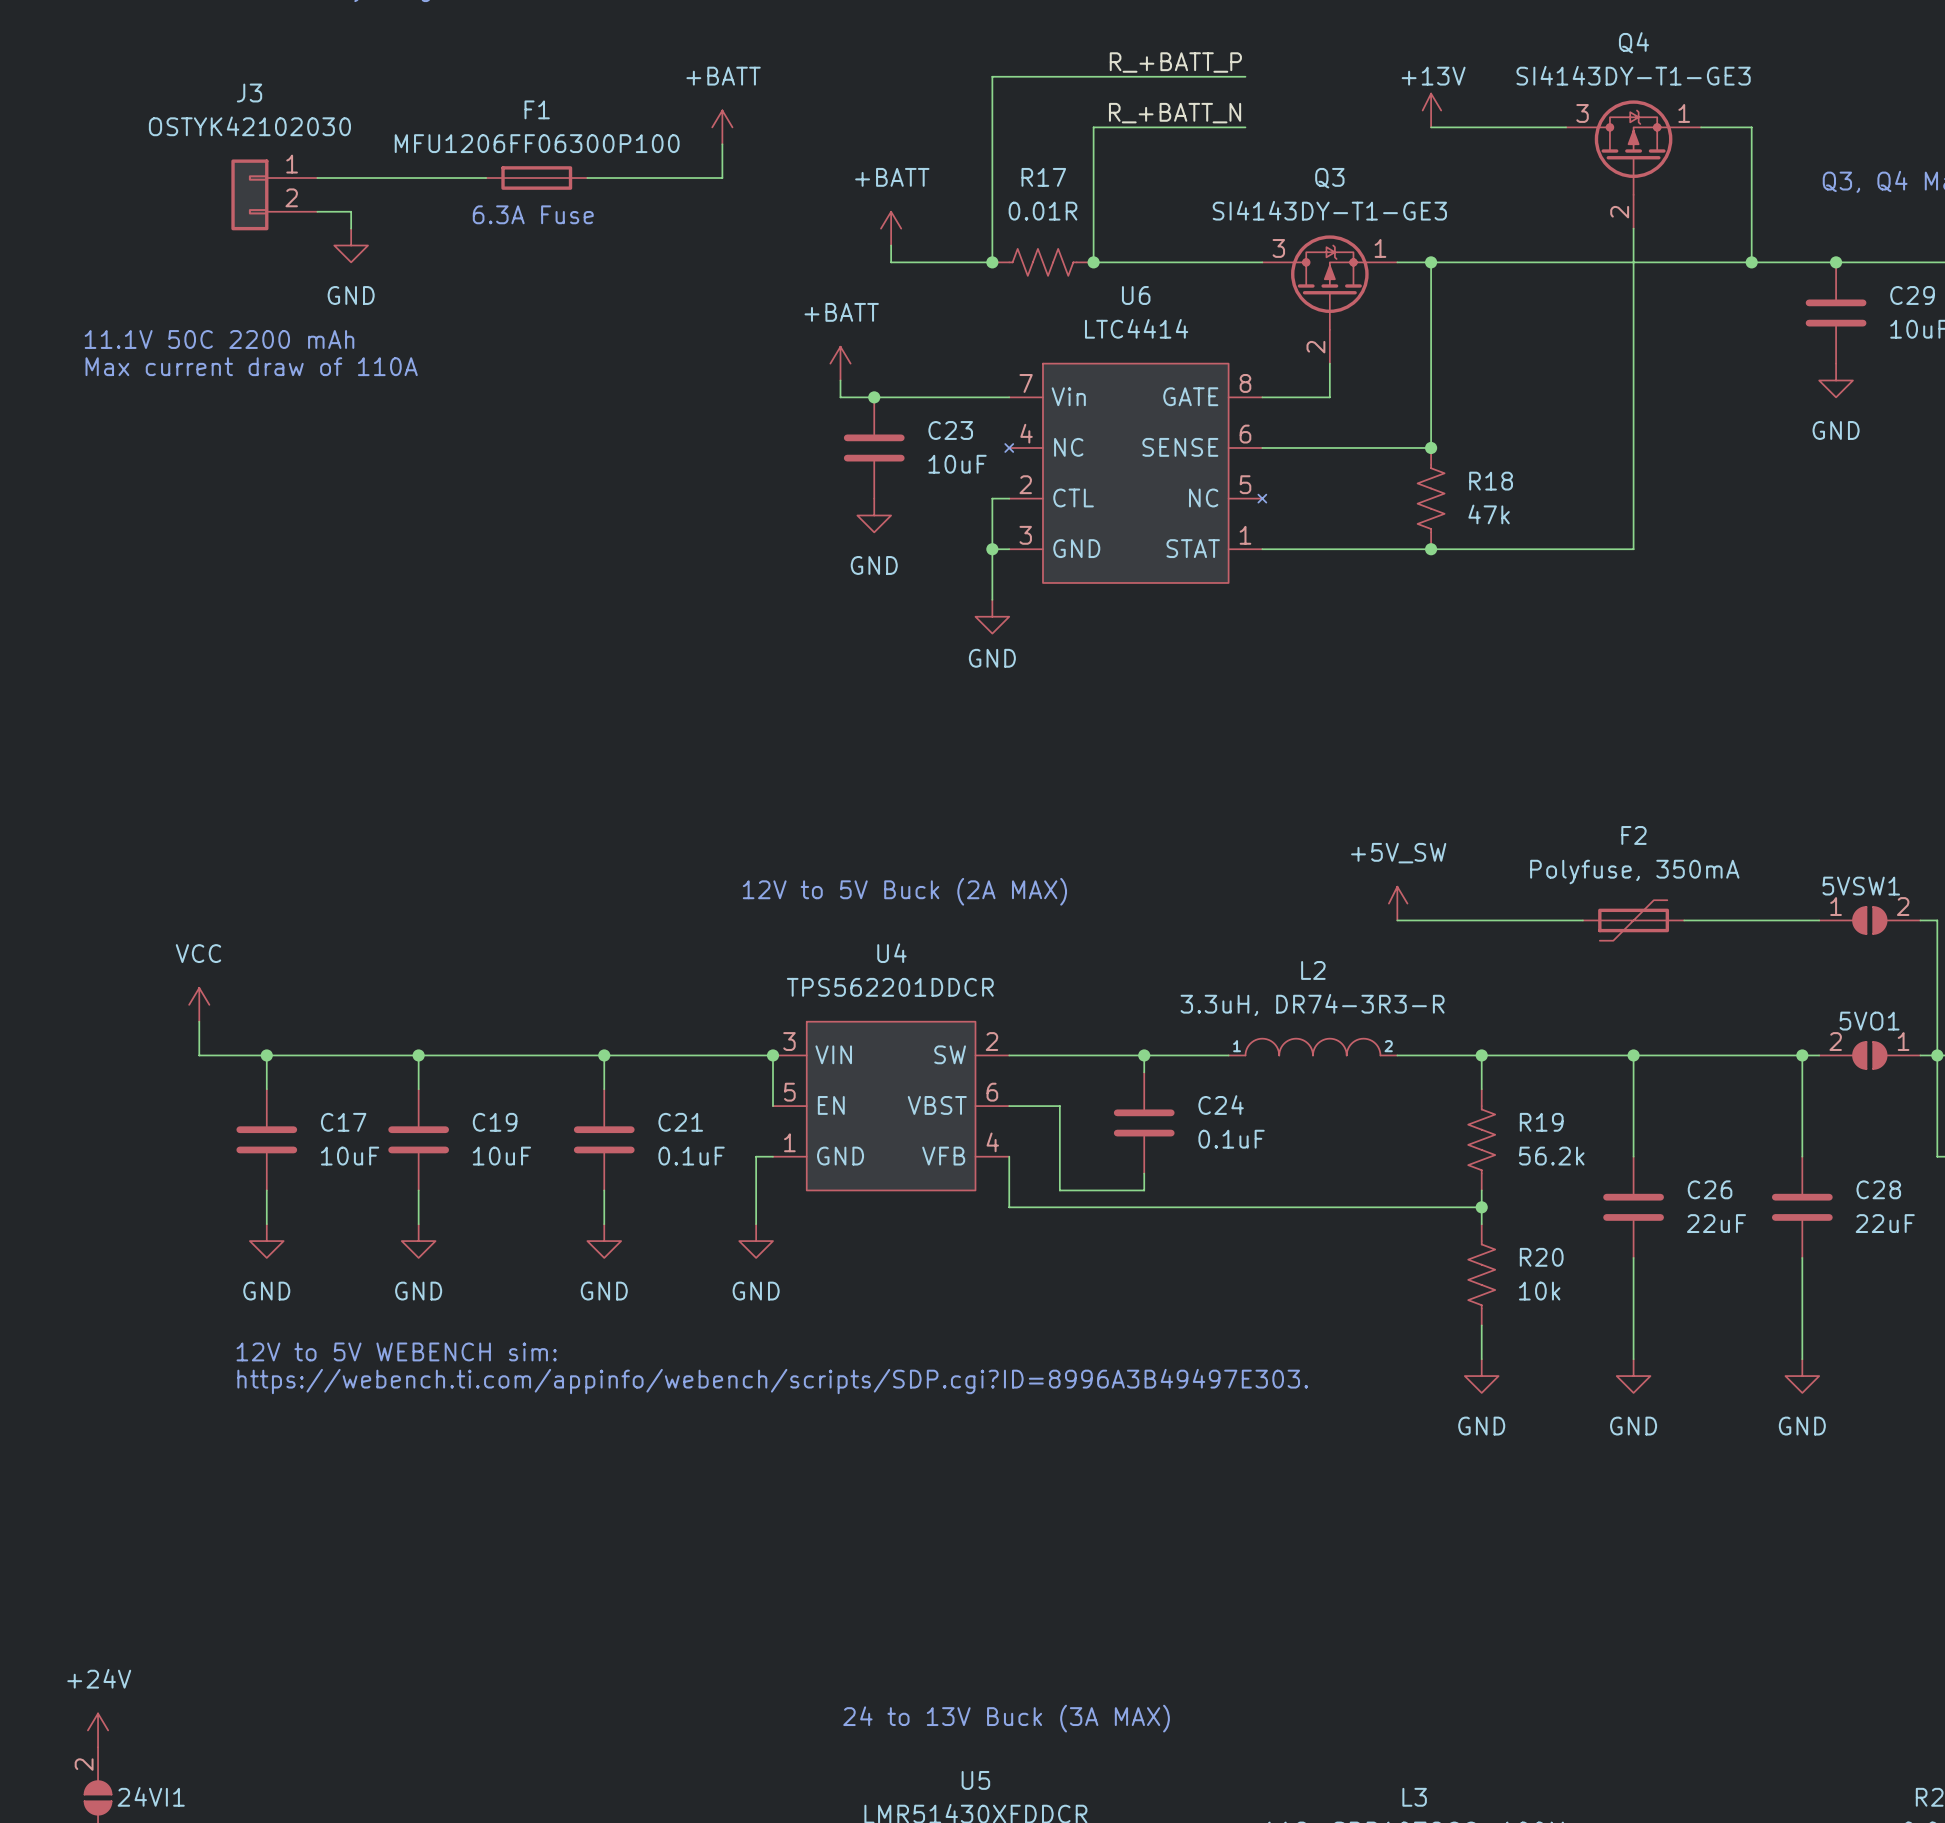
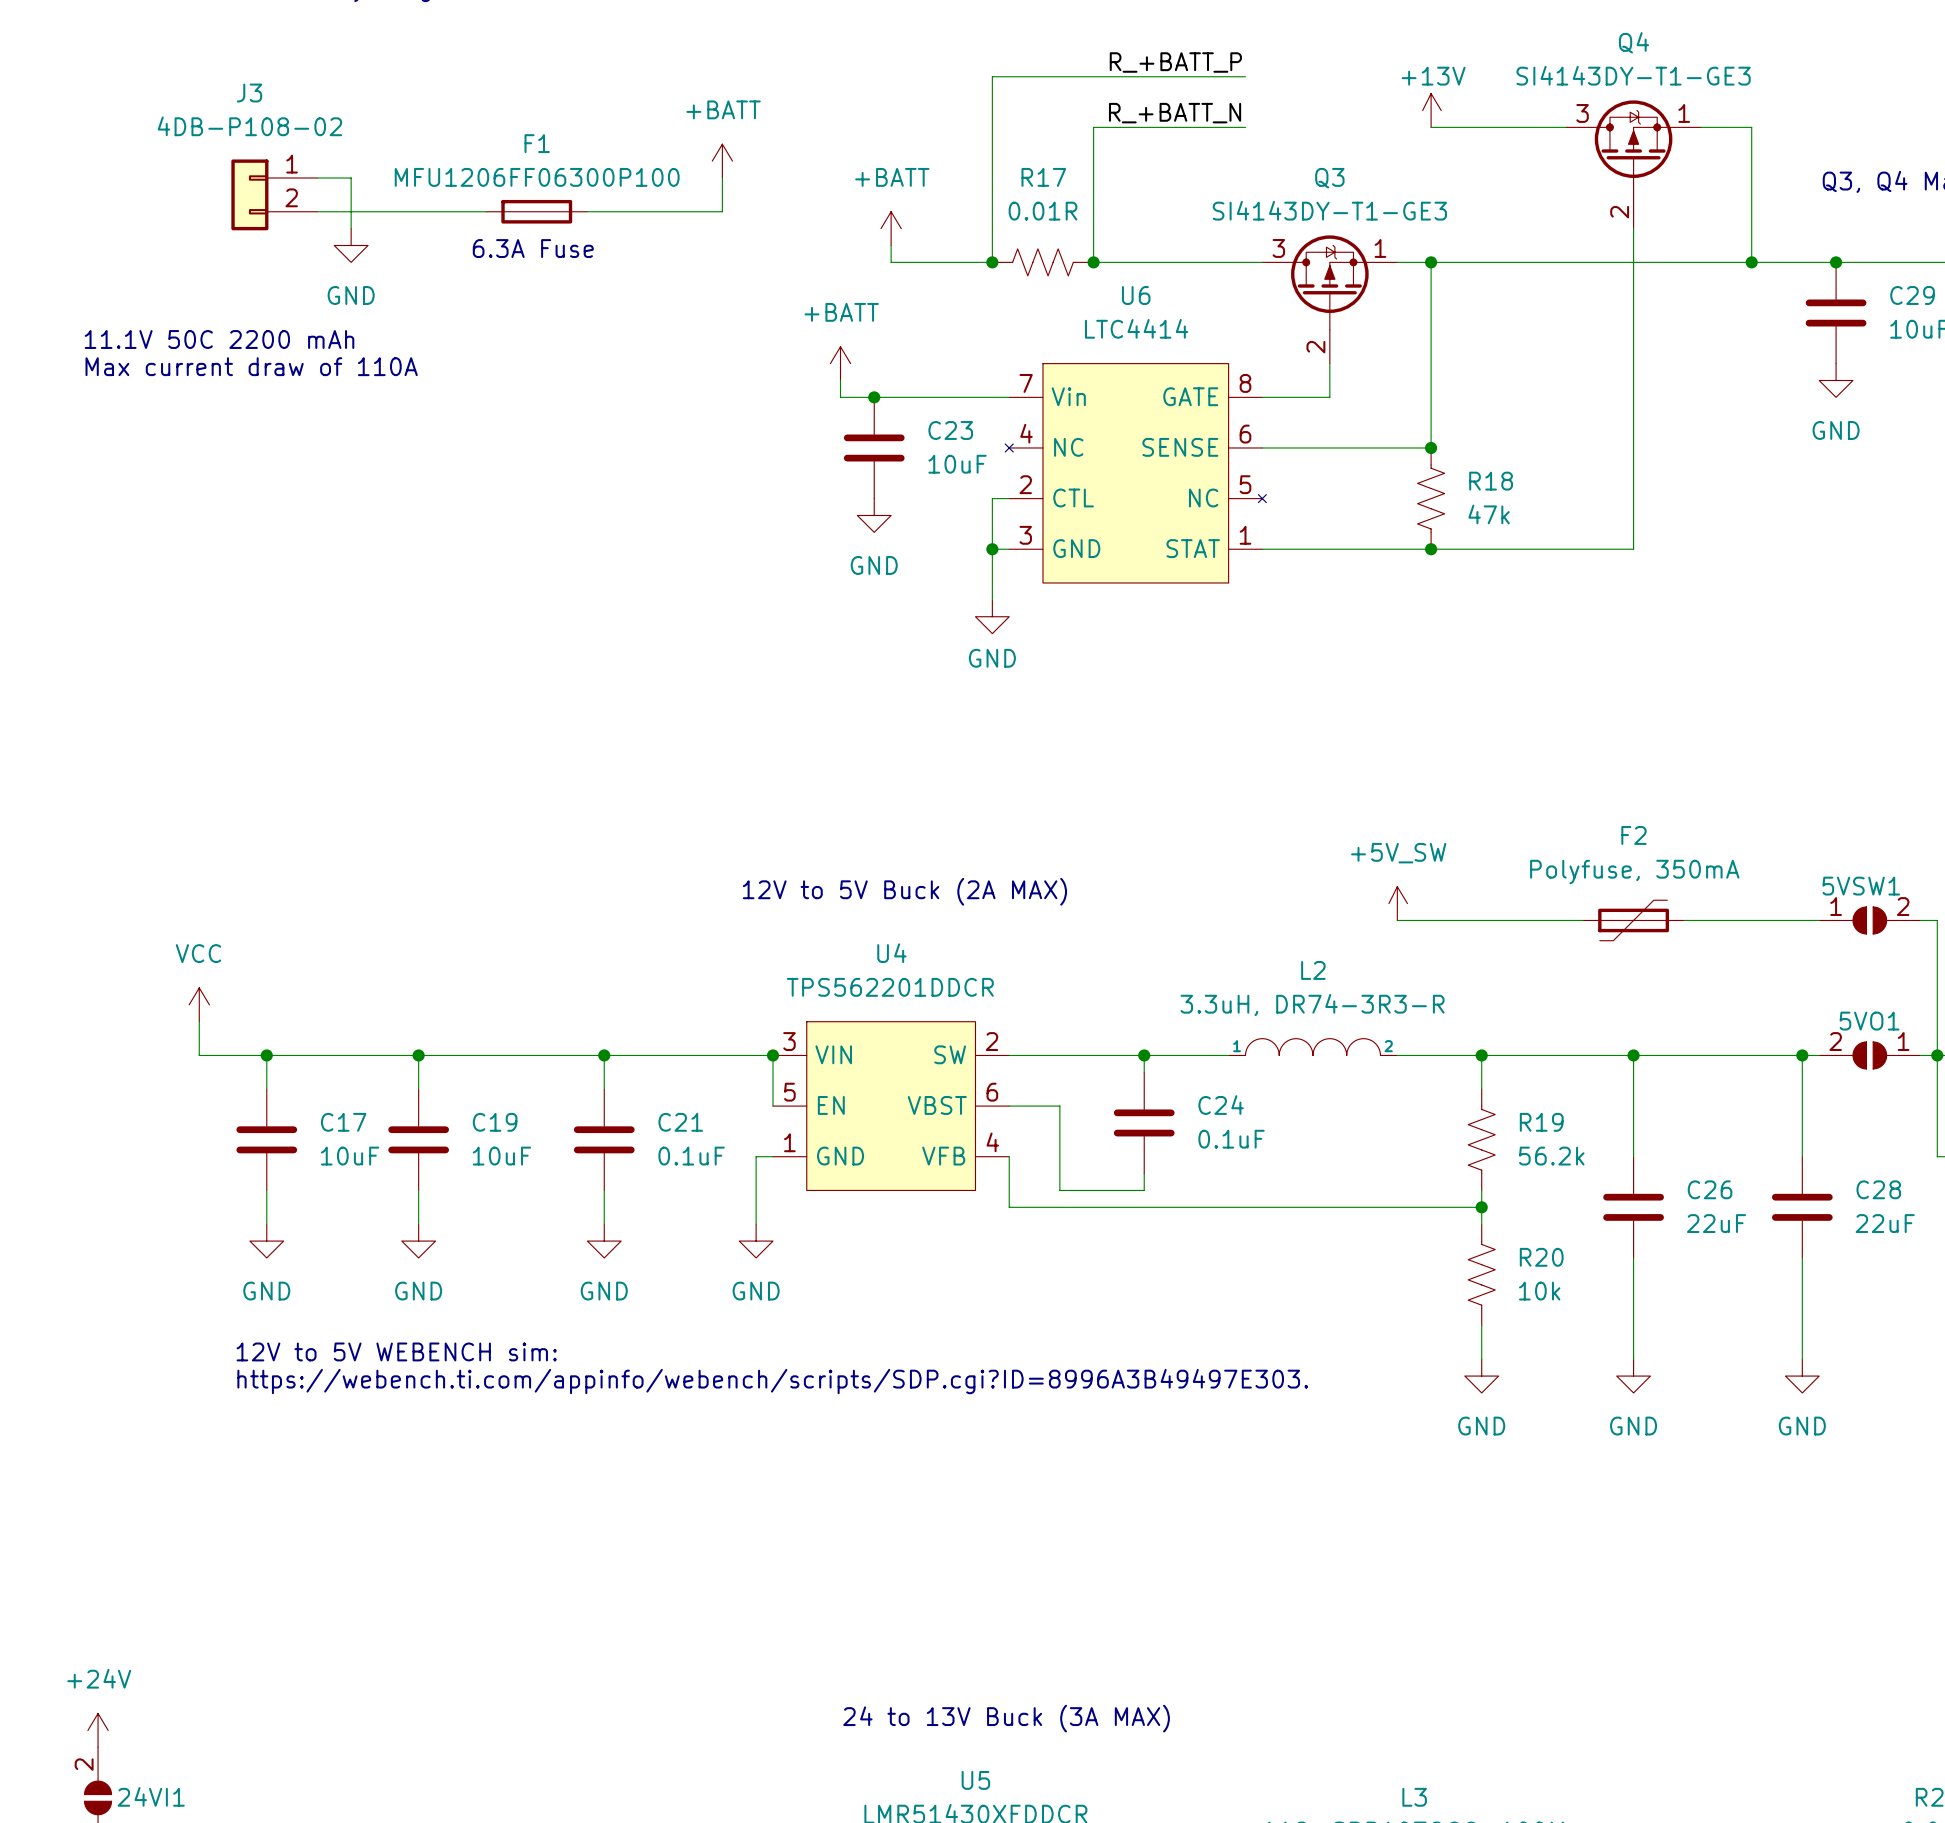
J3 value: OSTYK42102030 (249, 126) -> 4DB-P108-02 (249, 126)
power symbol position: +BATT (722, 127) -> +BATT (722, 161)
wire: (722, 144) (722, 178) (587, 178) -> (722, 178) (722, 211) (587, 211)
wire: (351, 178) (486, 178) -> (351, 178) (351, 211) (486, 211)
F1 position: (536, 178) -> (536, 211)
text position: 6.3A Fuse (533, 214) -> 6.3A Fuse (533, 248)

